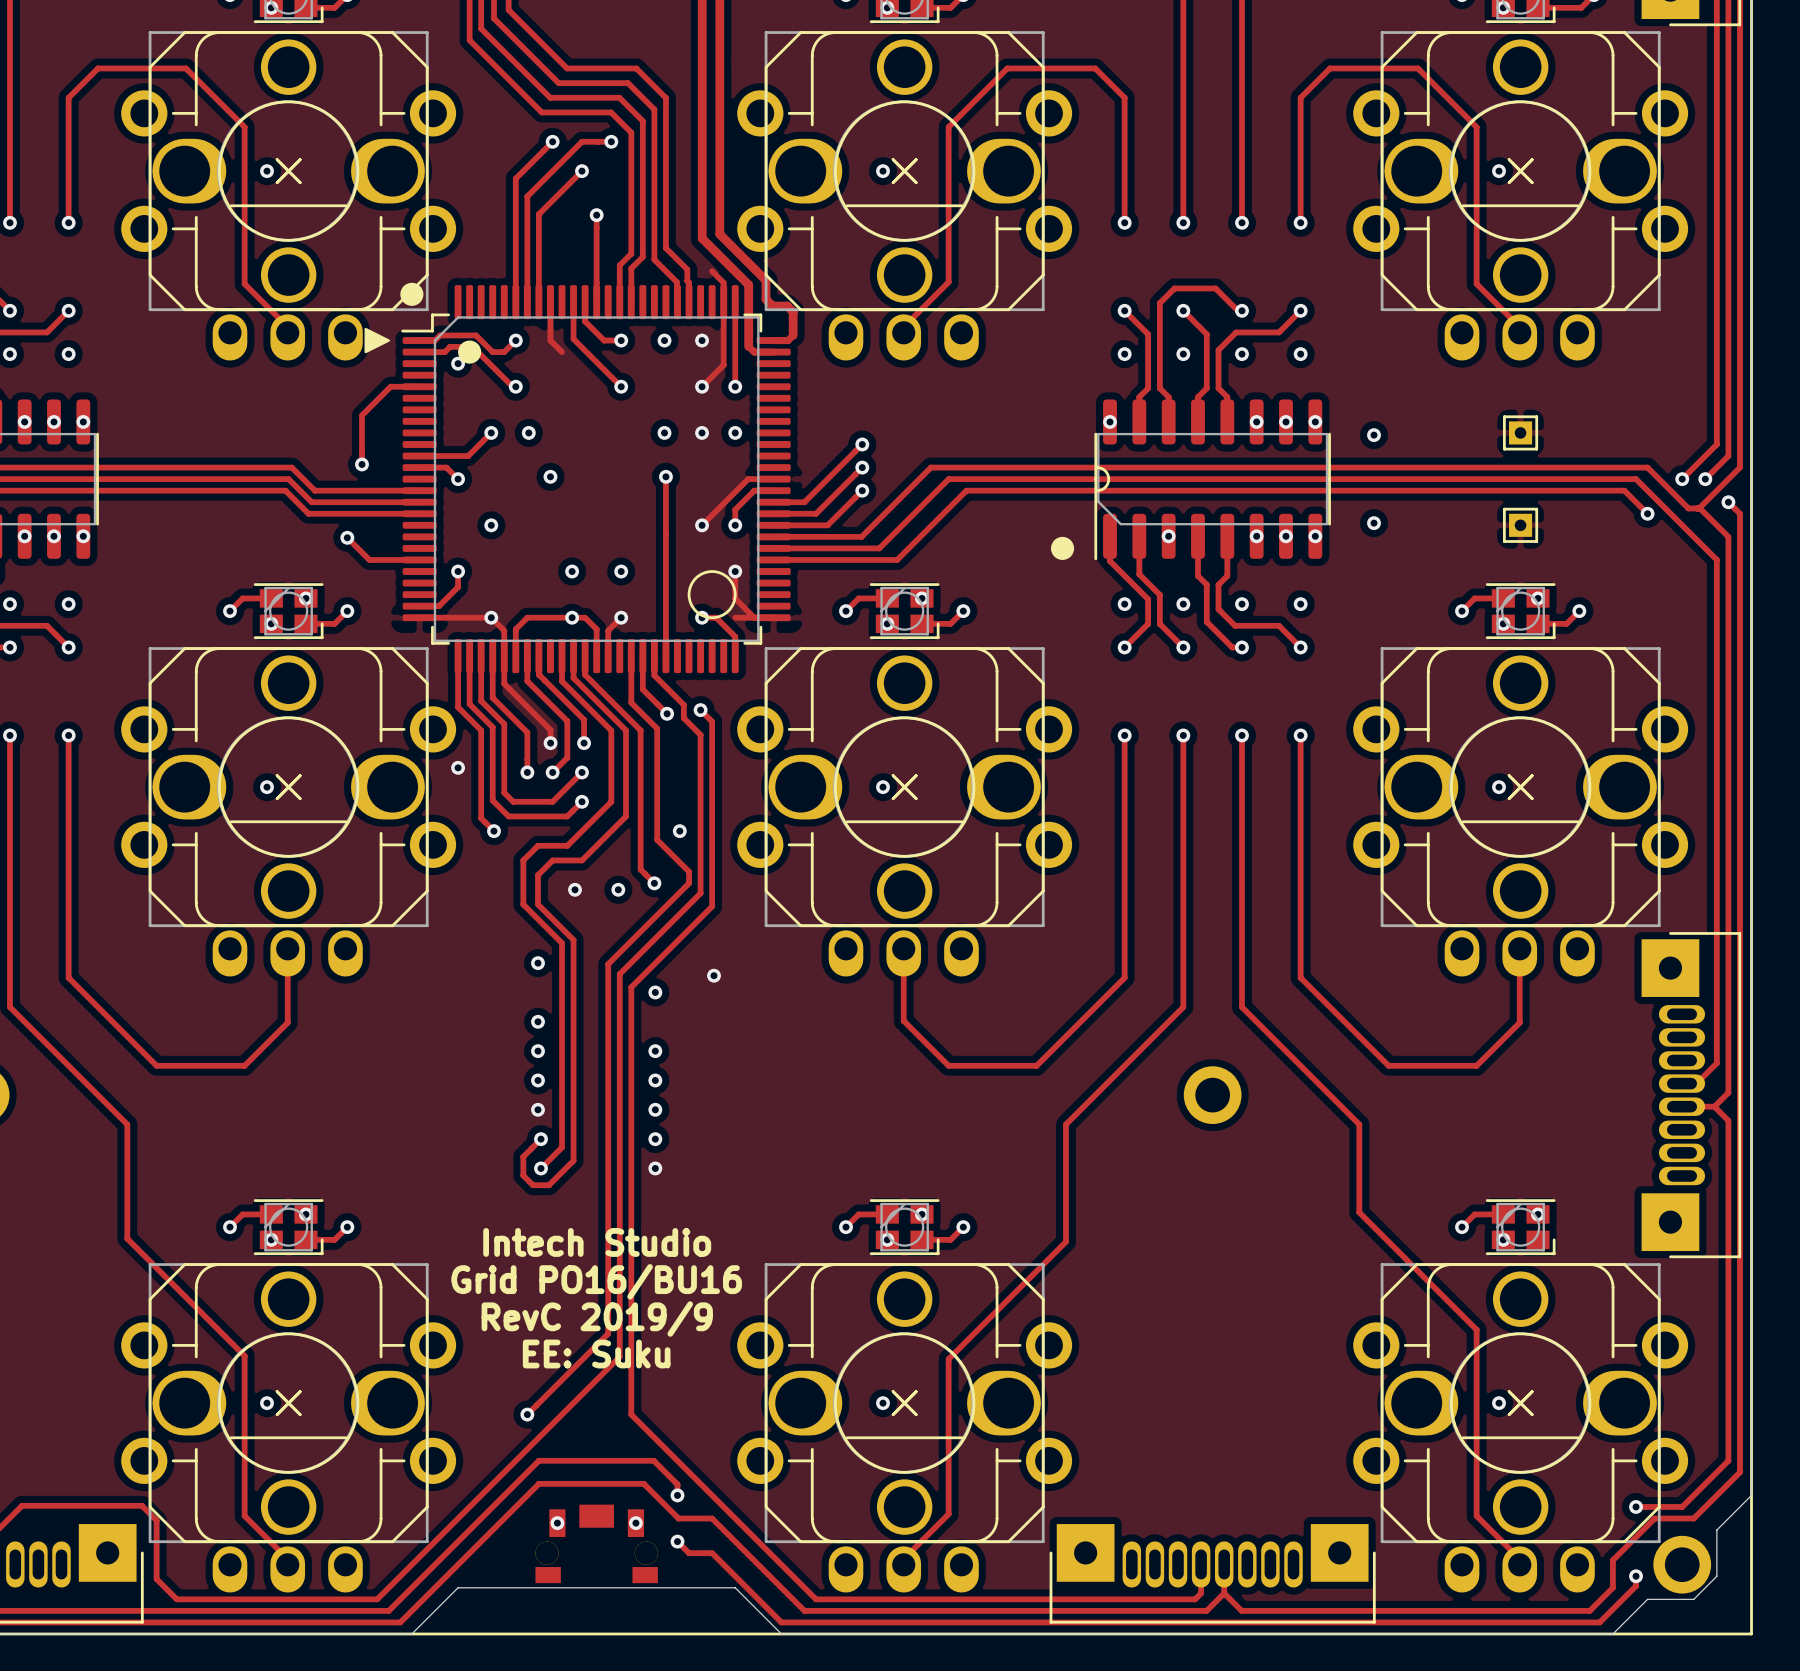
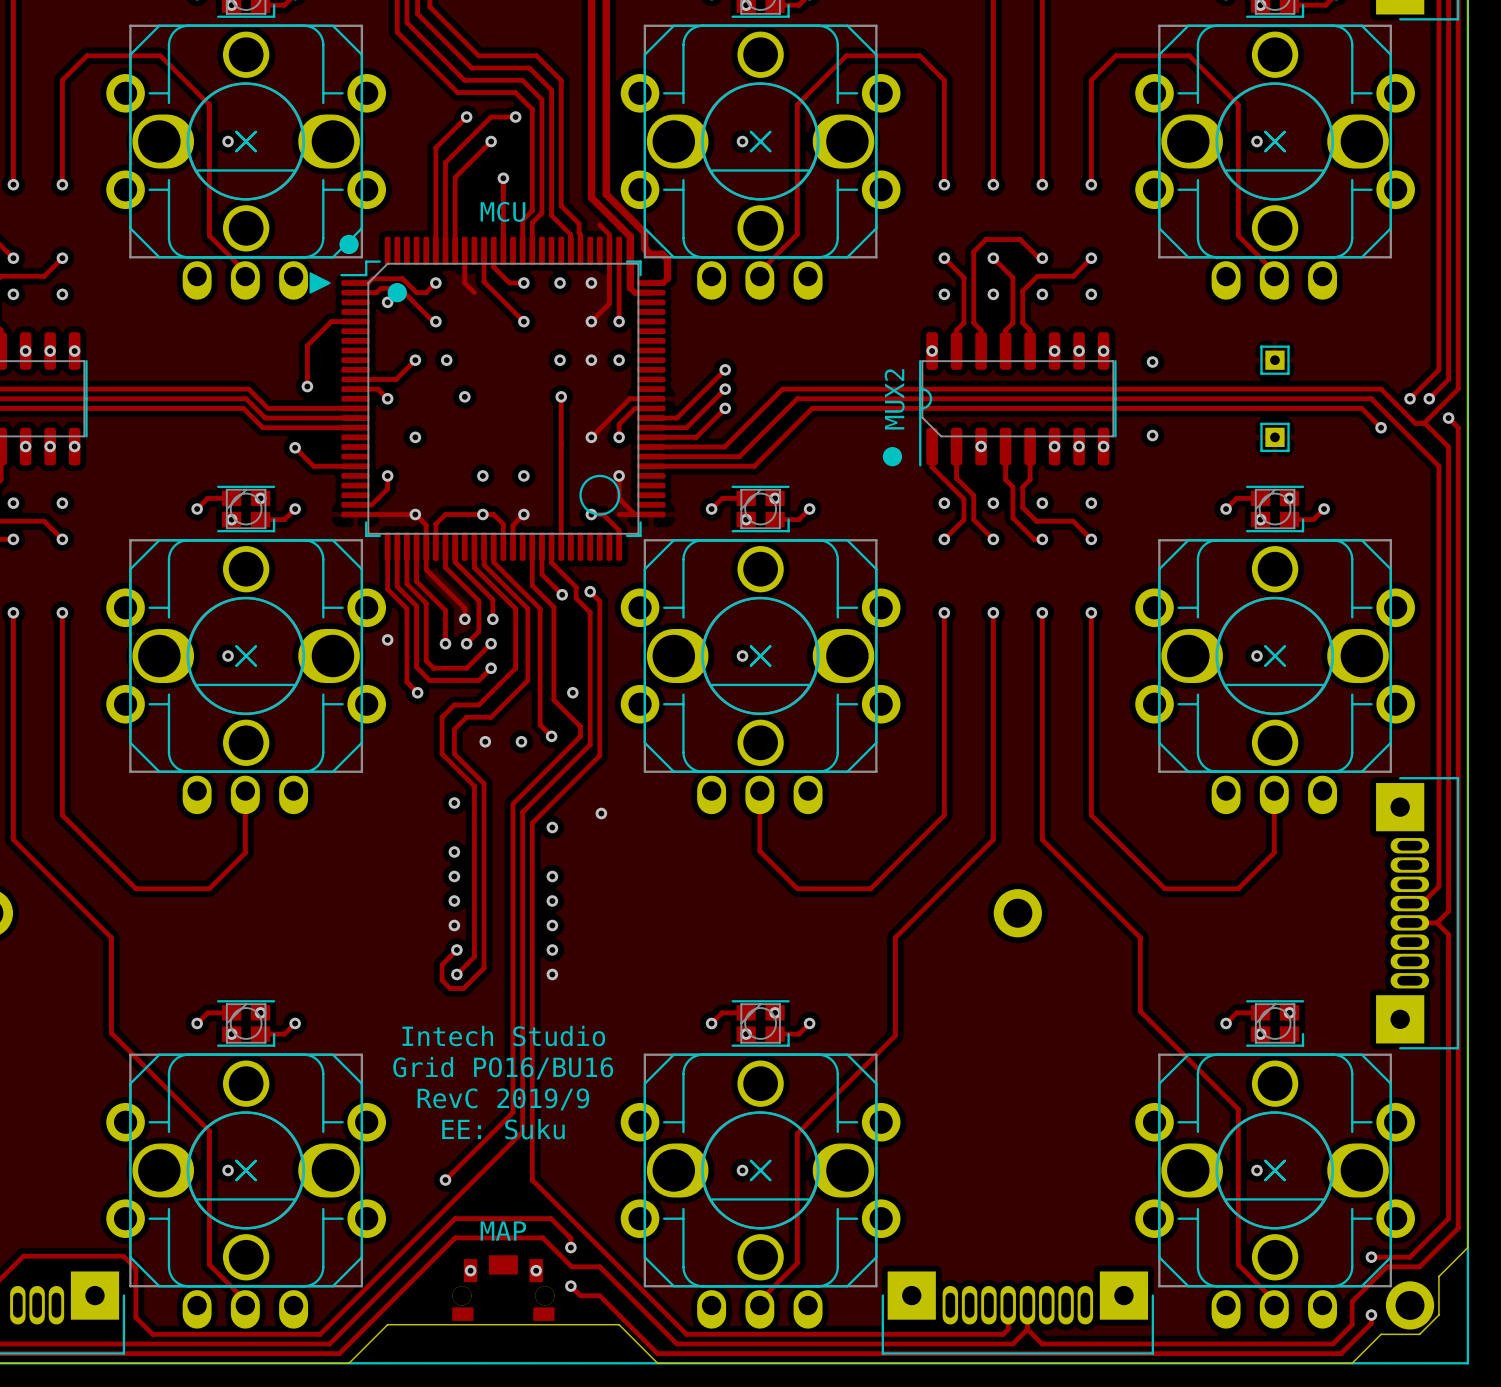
text: none -> MCU (502, 211)
text: none -> MUX2 (894, 399)
text: none -> MAP (503, 1231)

